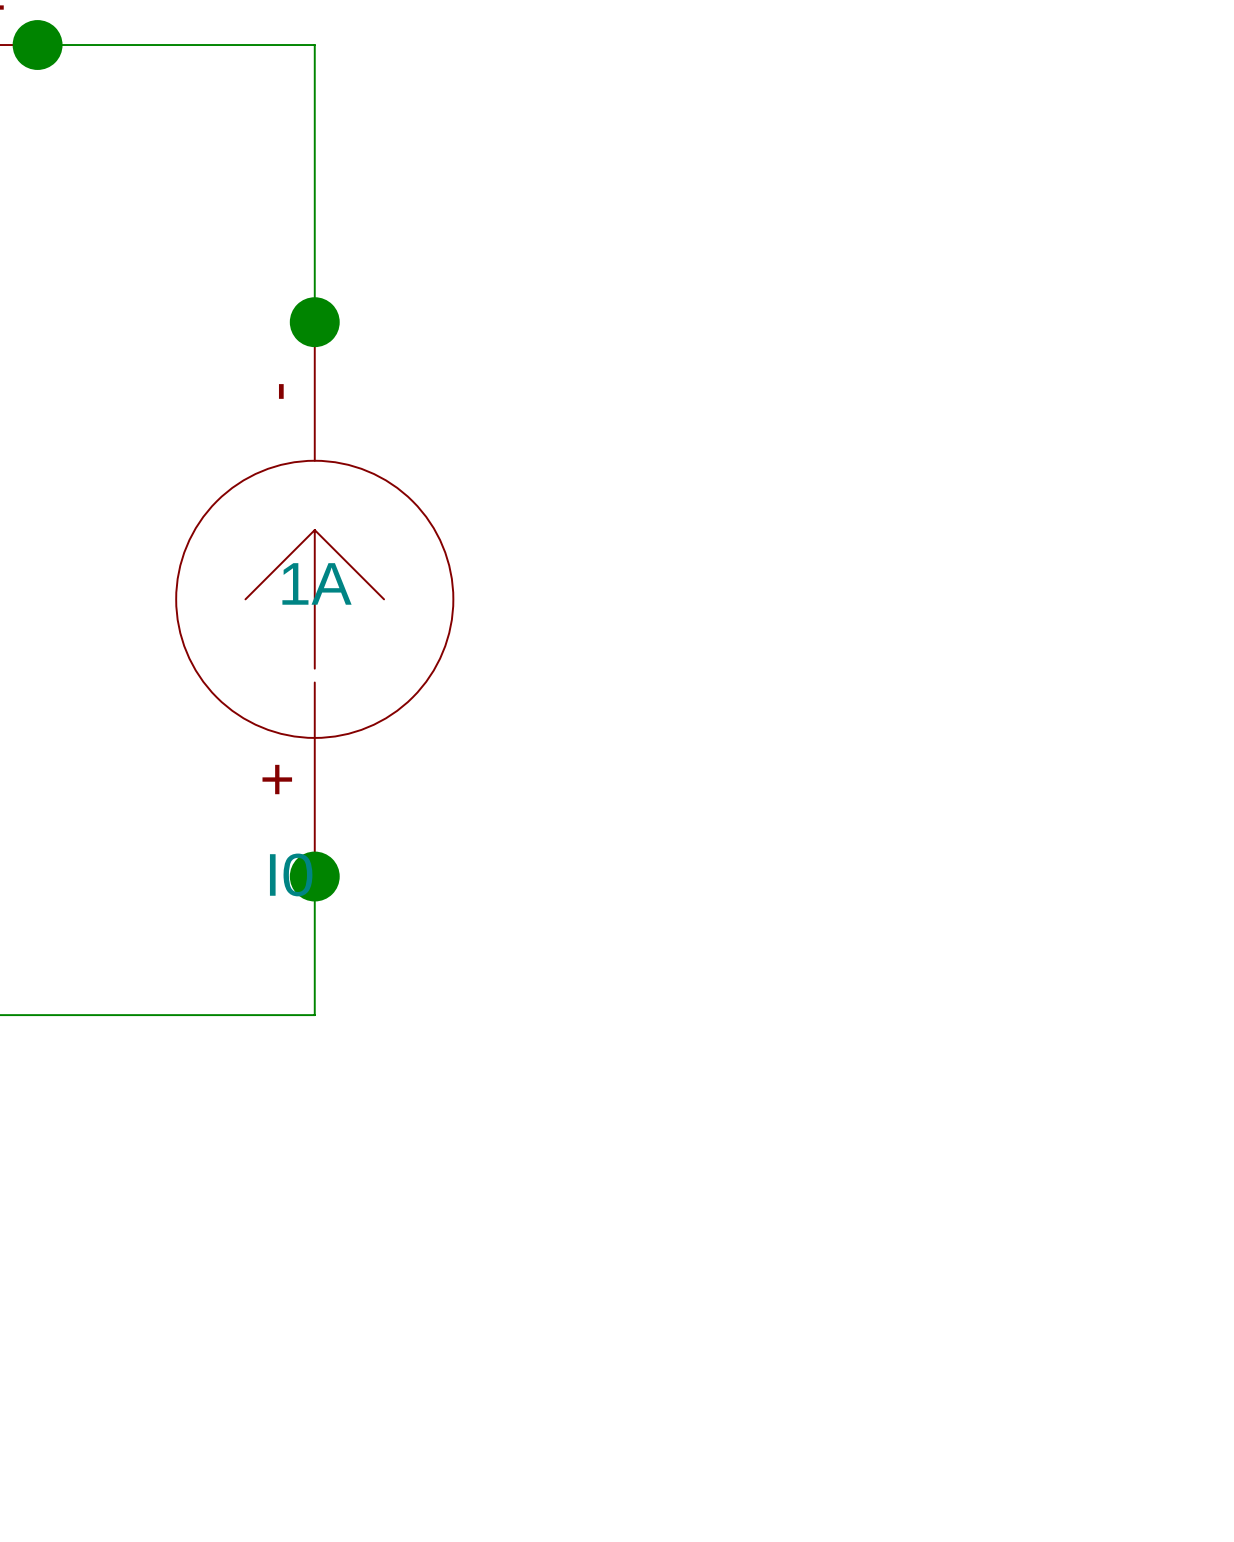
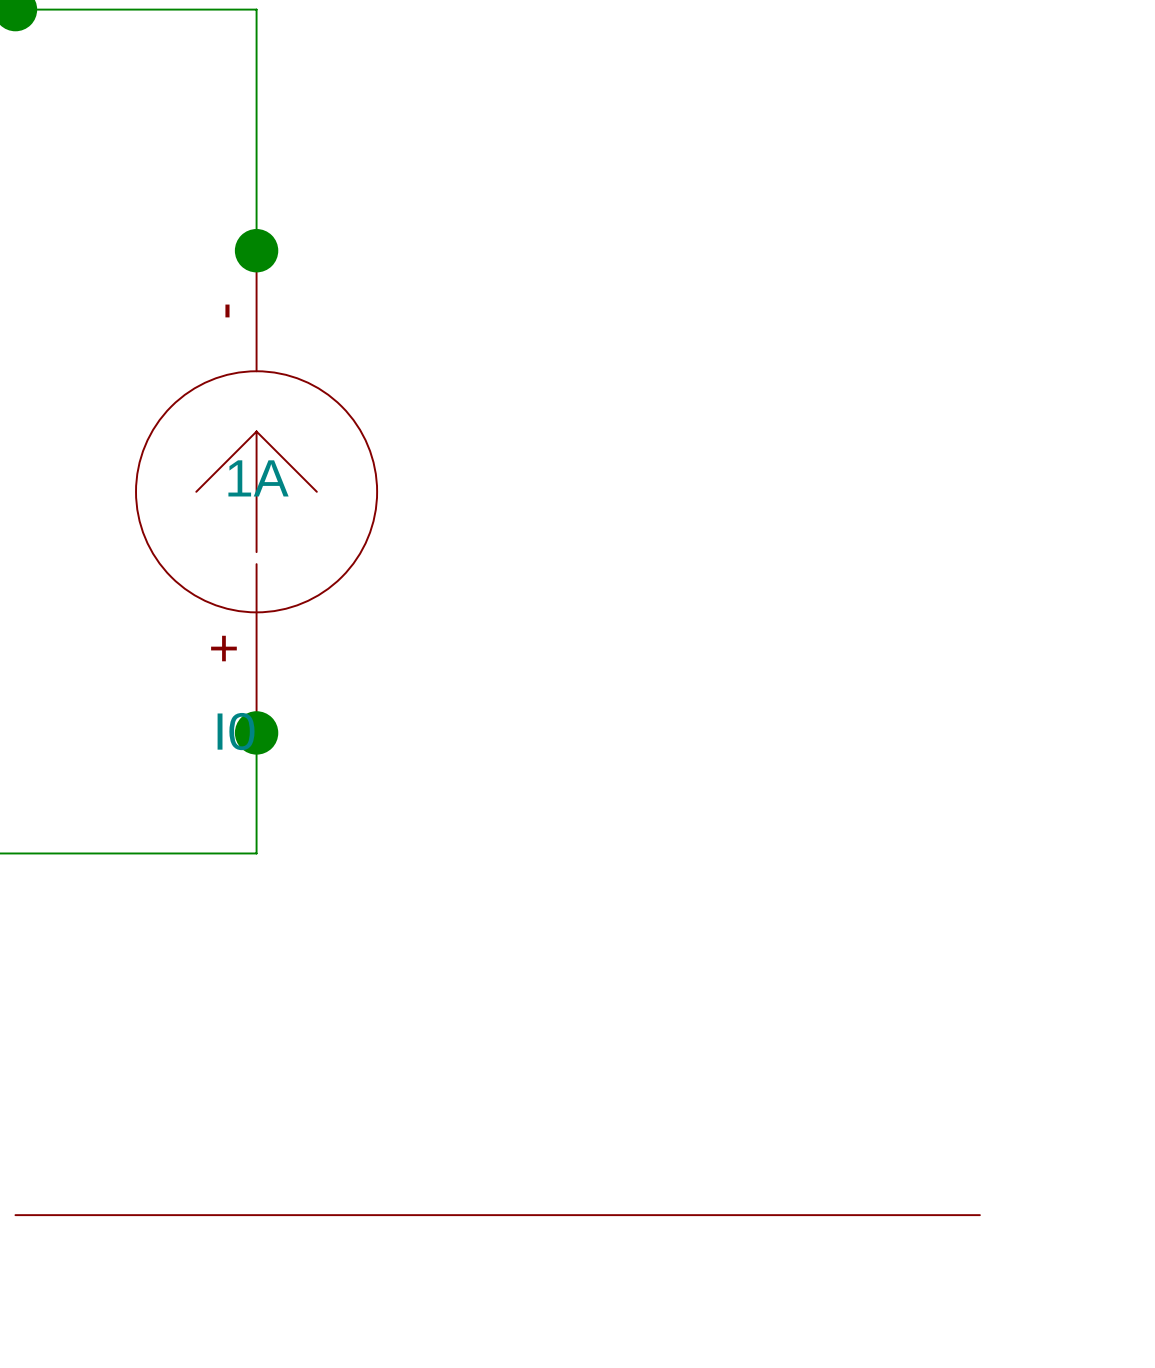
part: none -> (497, 1215)

